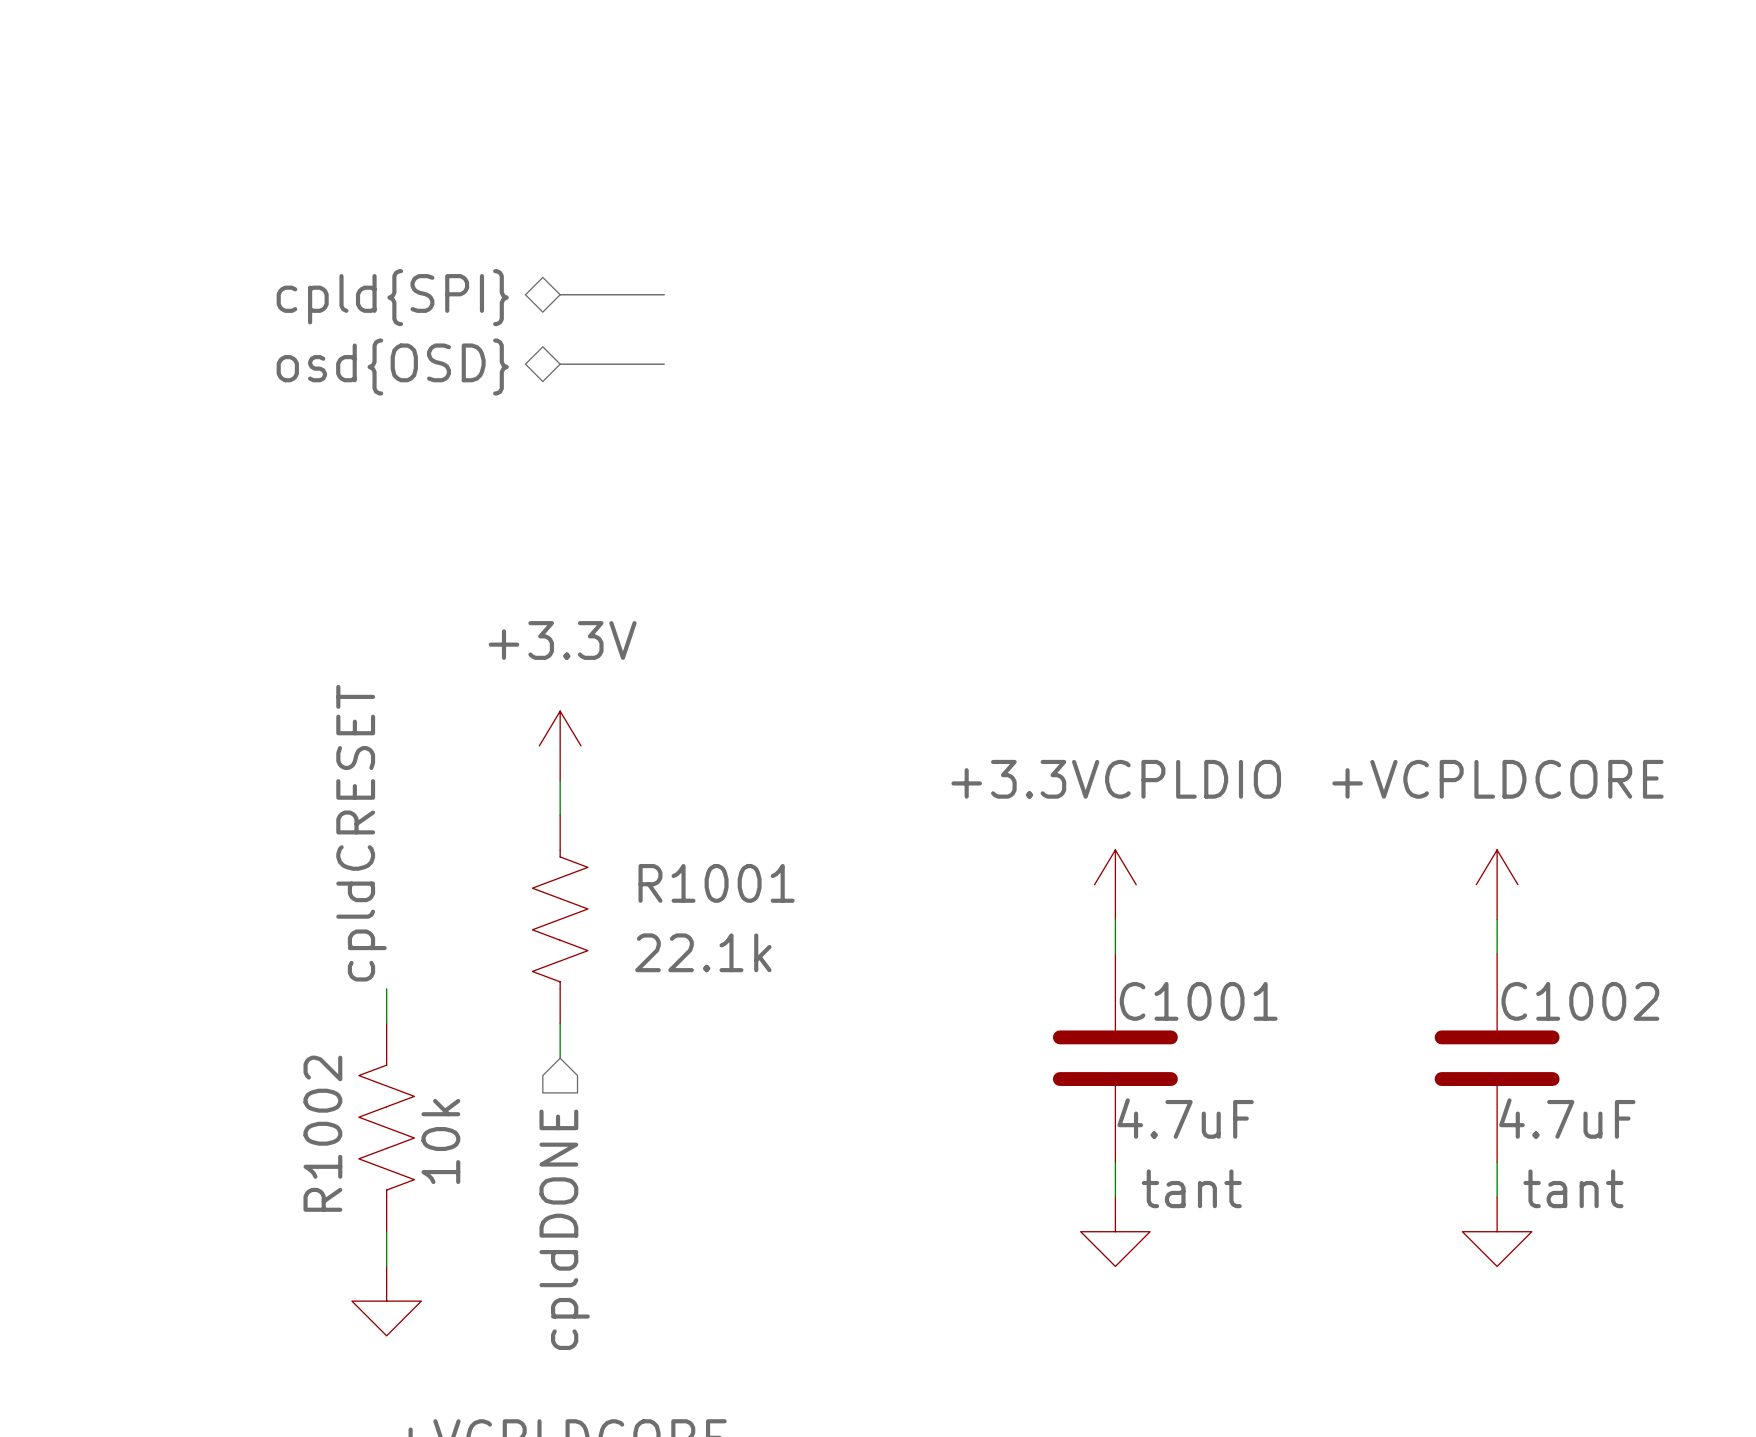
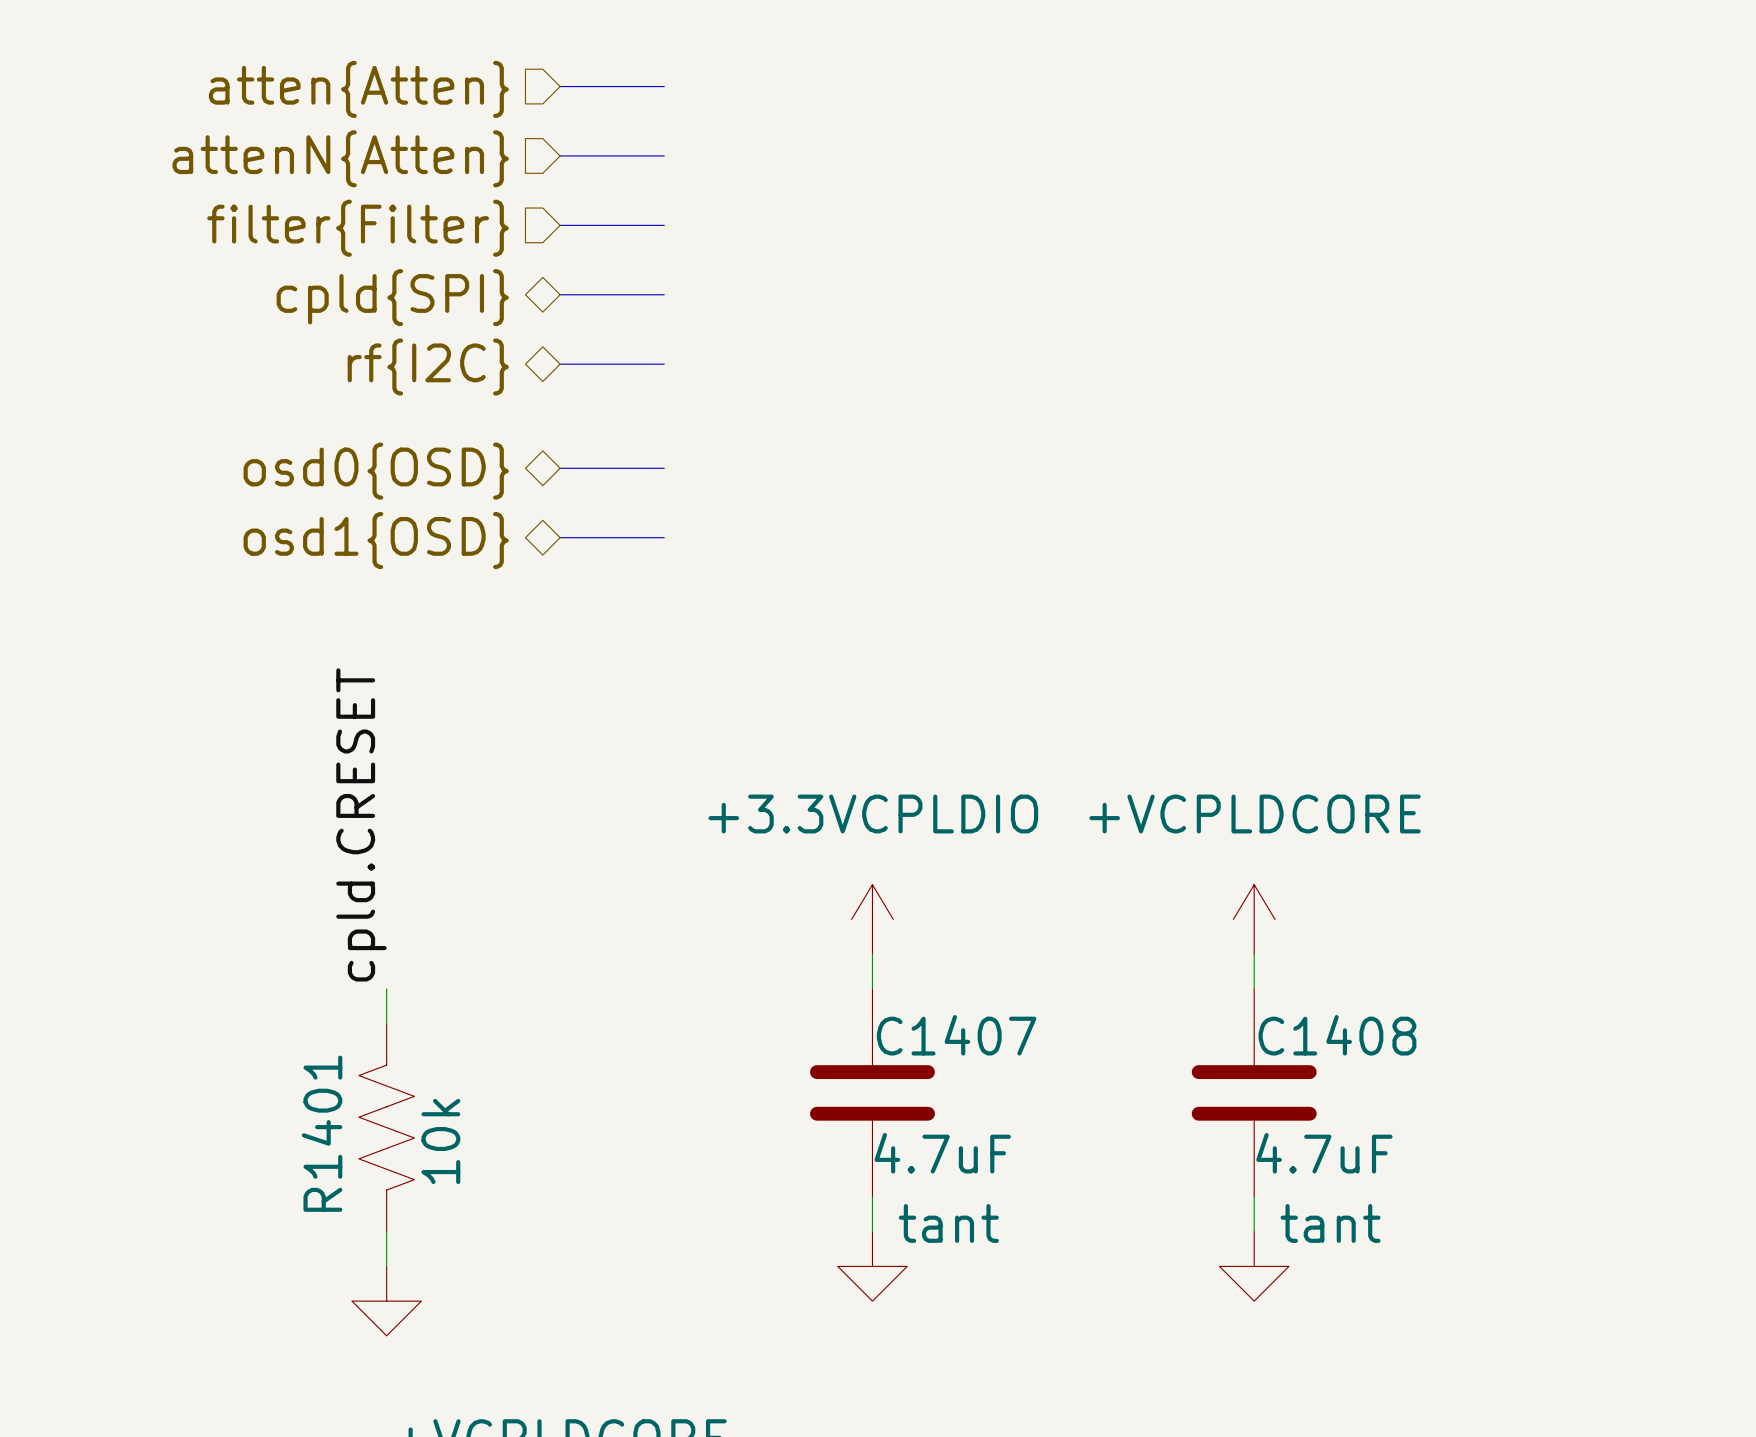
bus: none -> (560, 86) (664, 86)
hierarchical label: none -> atten{Atten} (358, 89)
bus: none -> (560, 155) (664, 155)
hierarchical label: none -> attenN{Atten} (340, 158)
bus: none -> (560, 225) (664, 225)
hierarchical label: none -> filter{Filter} (358, 228)
hierarchical label: osd{OSD} (392, 367) -> rf{I2C} (428, 367)
bus: none -> (560, 468) (664, 468)
hierarchical label: none -> osd0{OSD} (376, 471)
bus: none -> (560, 537) (664, 537)
hierarchical label: none -> osd1{OSD} (376, 540)
power symbol: +3.3V (560, 745) -> none
wire: (560, 780) (560, 815) -> none
label: cpldCRESET (361, 833) -> cpld.CRESET (361, 824)
power symbol position: +3.3VCPLDIO (1115, 884) -> +3.3VCPLDIO (872, 919)
power symbol position: +VCPLDCORE (1497, 884) -> +VCPLDCORE (1254, 919)
R1001: 22.1k (560, 919) -> none
wire: (1115, 919) (1115, 954) -> (872, 954) (872, 988)
wire: (1497, 919) (1497, 954) -> (1254, 954) (1254, 988)
wire: (560, 1023) (560, 1058) -> none
C1001: 4.7uF (1115, 1058) -> none
C1002: 4.7uF (1497, 1058) -> none
C1407: none -> 4.7uF (872, 1092)
C1408: none -> 4.7uF (1254, 1092)
R1002 name: R1002 (322, 1133) -> R1401 (322, 1133)
wire: (1115, 1162) (1115, 1197) -> (872, 1197) (872, 1231)
wire: (1497, 1162) (1497, 1197) -> (1254, 1197) (1254, 1231)
hierarchical label: cpldDONE (564, 1229) -> none
power symbol: (1115, 1231) -> none
power symbol: (1497, 1231) -> none
power symbol: none -> (872, 1266)
power symbol: none -> (1254, 1266)

